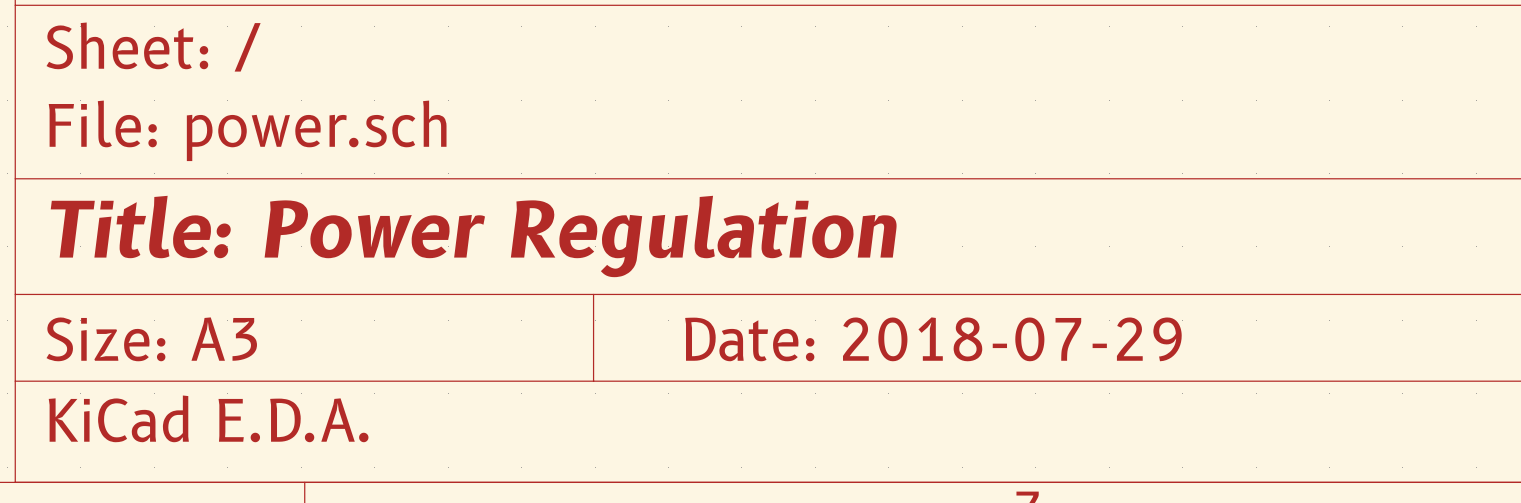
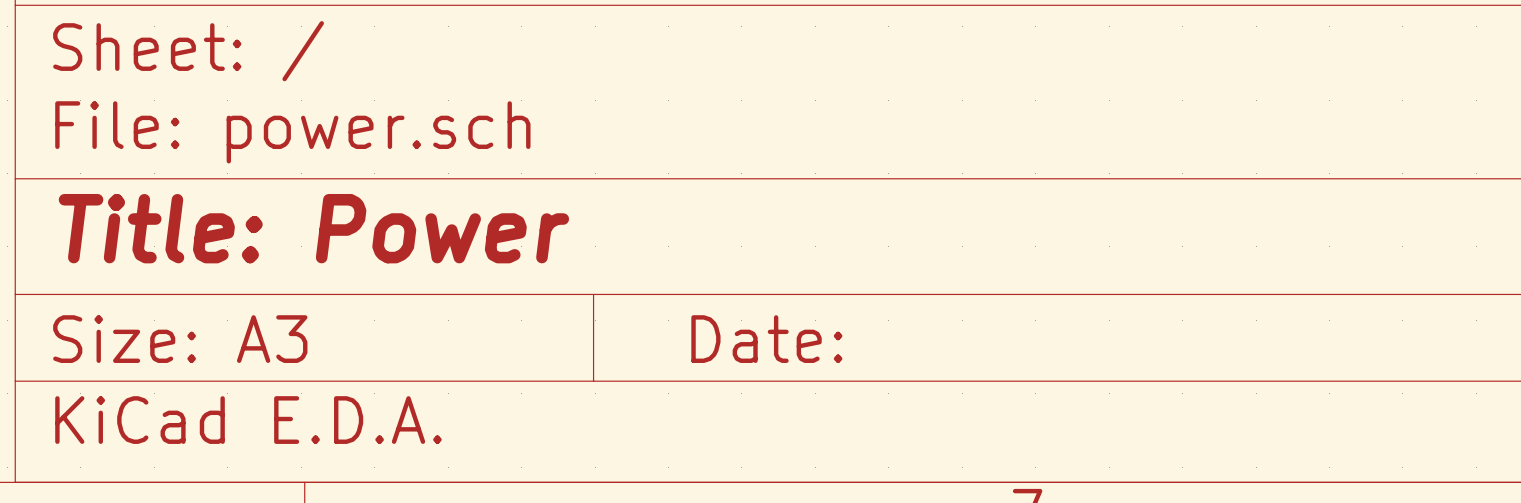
title block: Title: Power Regulation (473, 236) -> Title: Power (313, 228)
title block: Date: 2018-07-29 (933, 339) -> Date: (766, 339)

